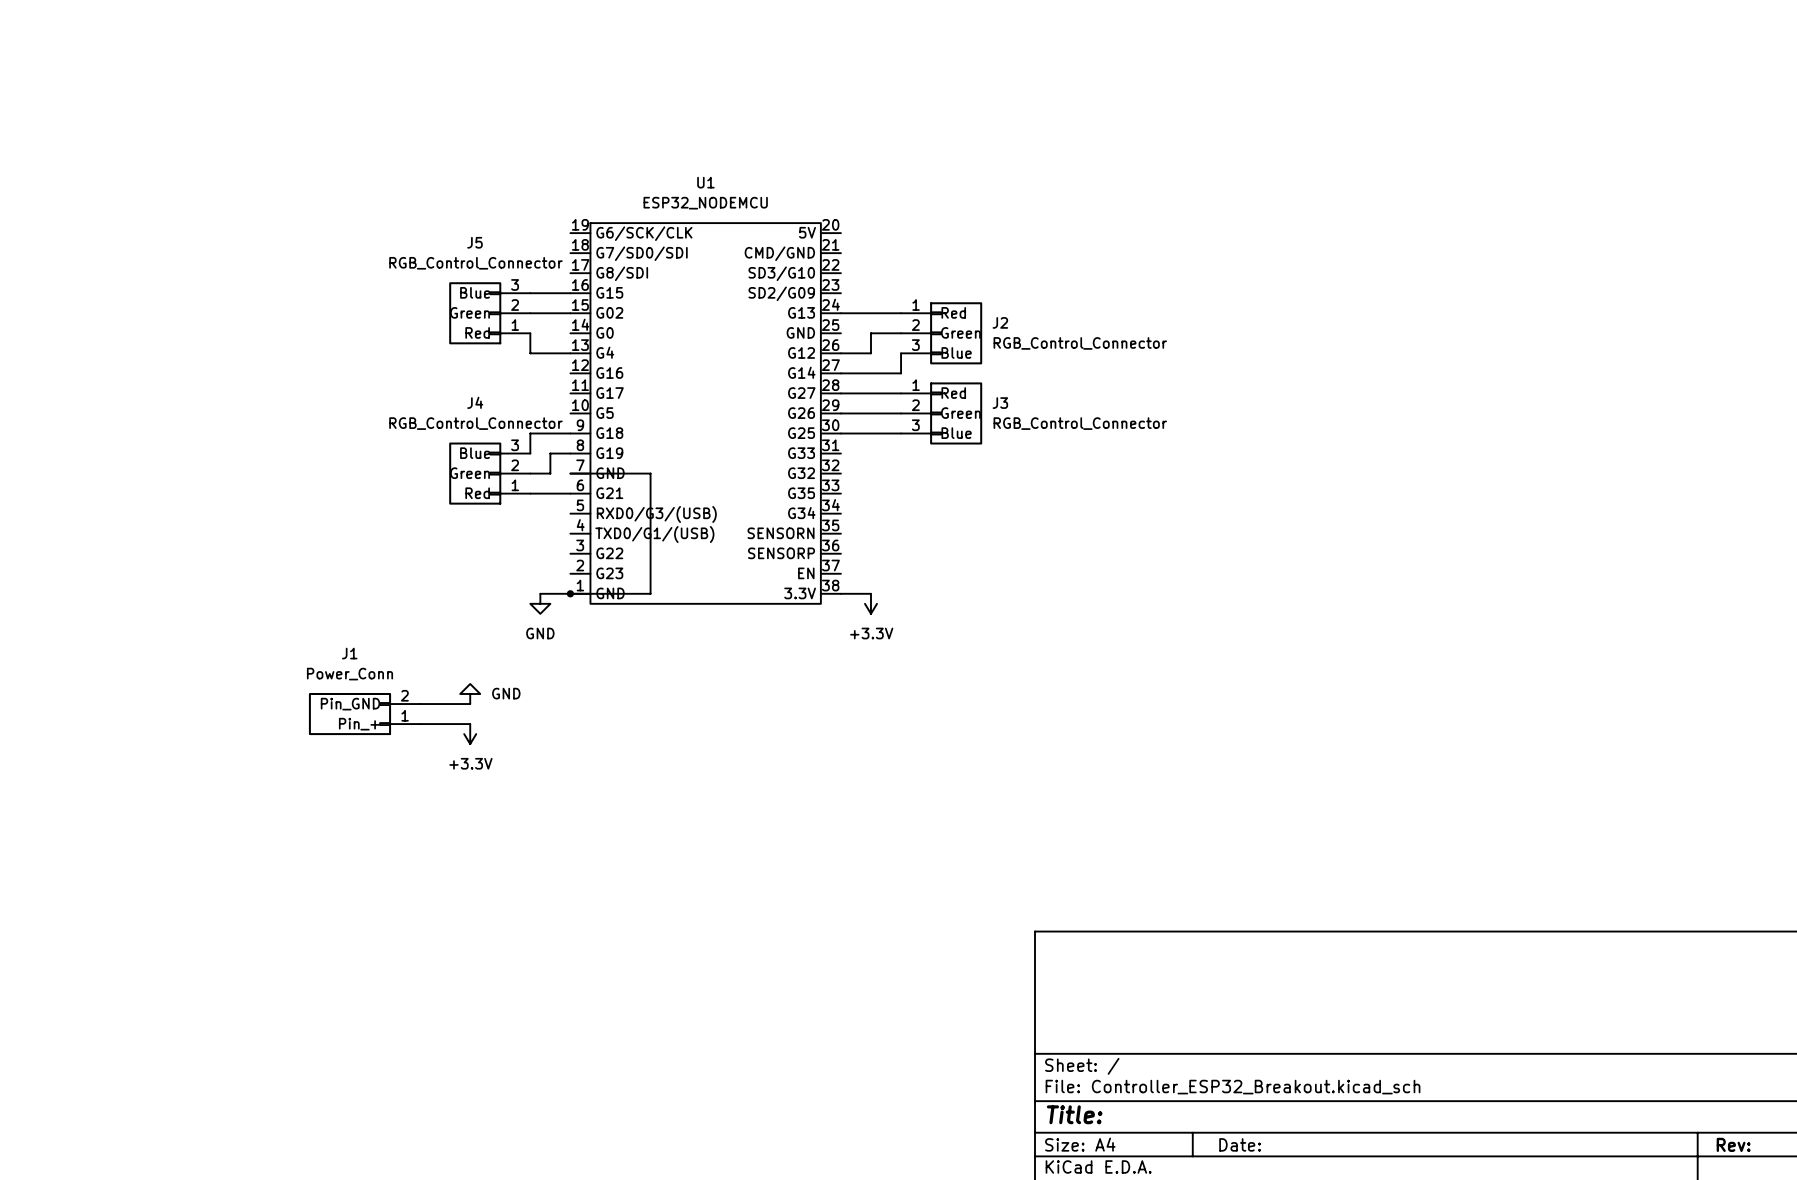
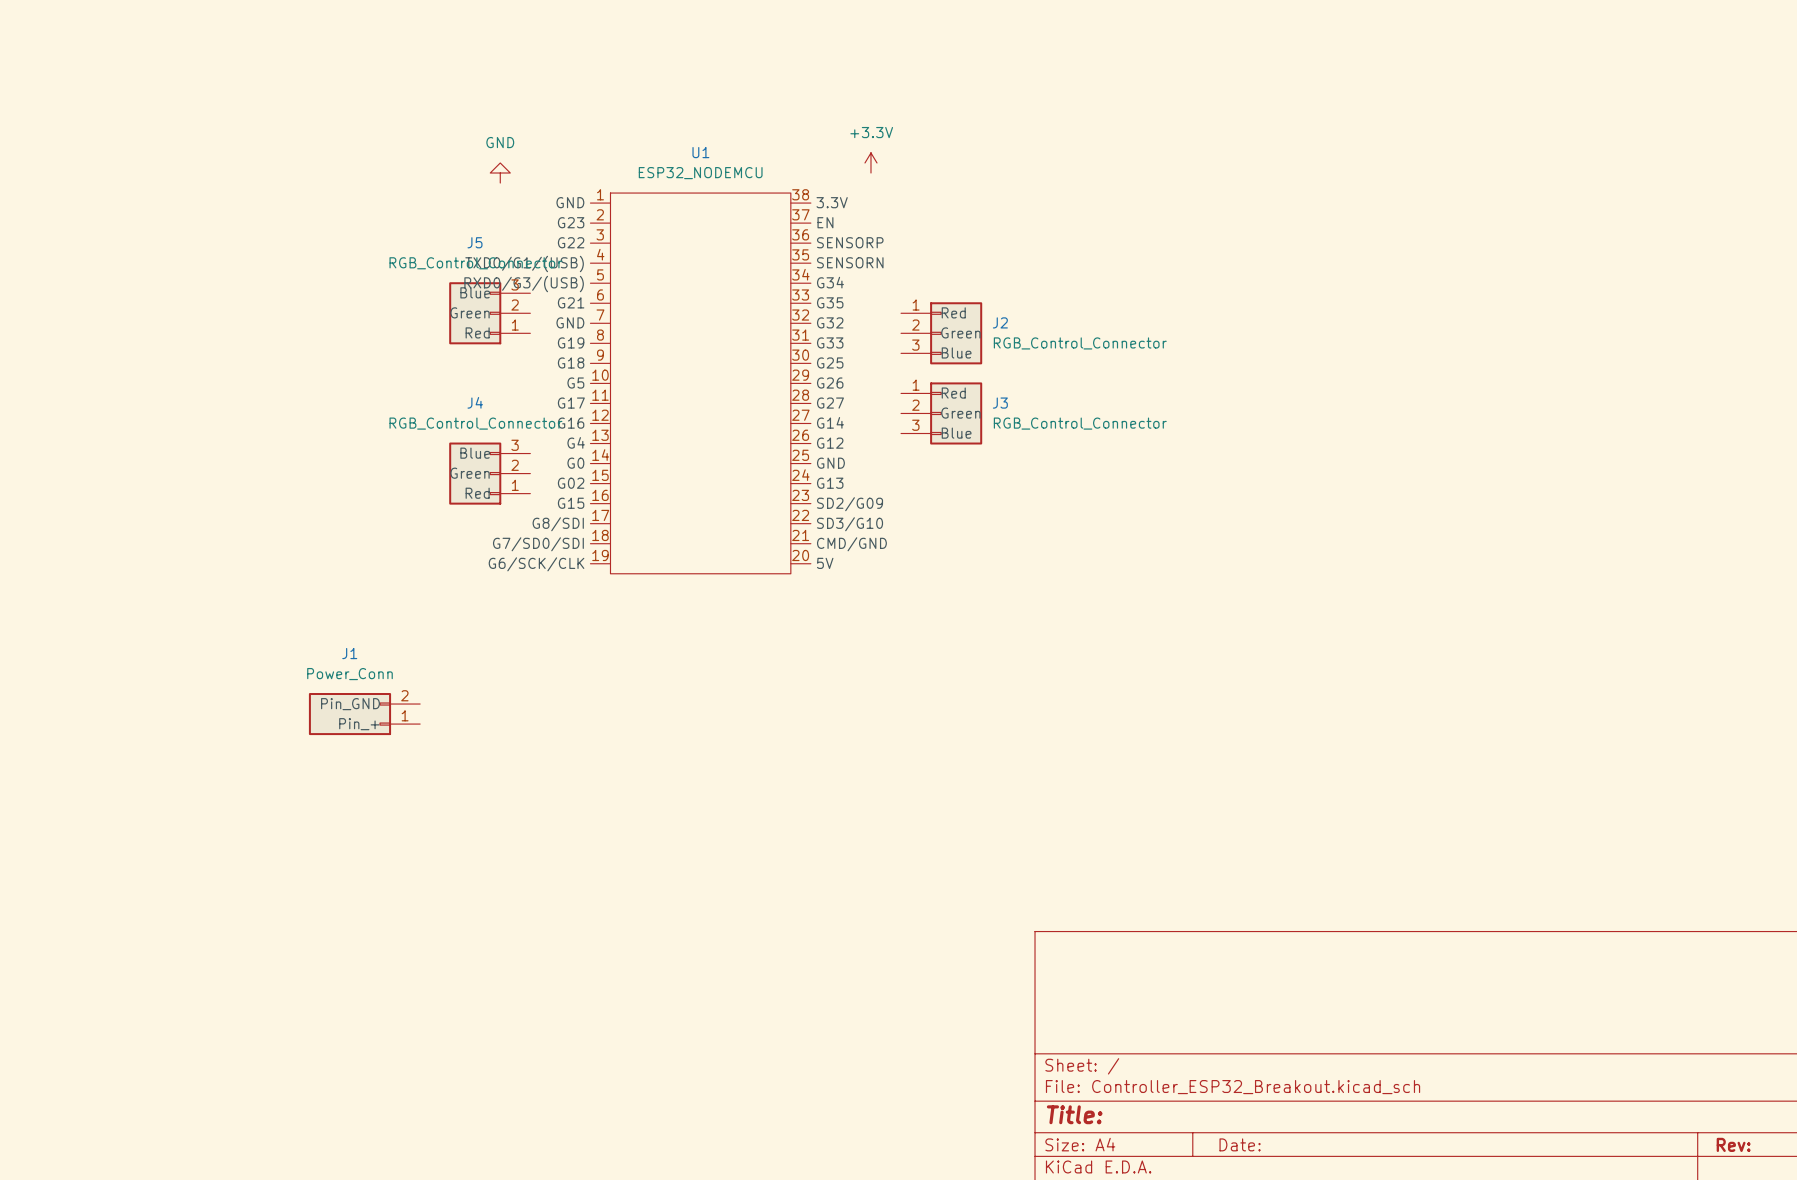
power symbol: none -> +3.3V (870, 162)
power symbol: none -> GND (500, 173)
U1 symbol: [570, 223, 841, 604] -> [590, 193, 811, 574]
wire: (530, 293) (570, 293) -> none
wire: (530, 313) (570, 313) -> none
wire: (840, 313) (901, 313) -> none
wire: (530, 333) (530, 353) (570, 353) -> none
wire: (901, 333) (870, 333) (870, 353) (840, 353) -> none
wire: (901, 353) (901, 373) (840, 373) -> none
wire: (840, 393) (901, 393) -> none
wire: (840, 413) (901, 413) -> none
wire: (570, 433) (530, 433) (530, 453) -> none
wire: (840, 433) (901, 433) -> none
wire: (570, 453) (550, 453) (550, 473) (530, 473) -> none
wire: (570, 473) (650, 473) (650, 593) (540, 593) -> none
wire: (530, 493) (570, 493) -> none
junction: (570, 593) -> none
wire: (840, 593) (870, 593) -> none
power symbol: GND (540, 603) -> none
power symbol: +3.3V (870, 603) -> none
power symbol: GND (470, 694) -> none
wire: (420, 704) (470, 704) -> none
wire: (420, 724) (470, 724) -> none
power symbol: +3.3V (470, 734) -> none

